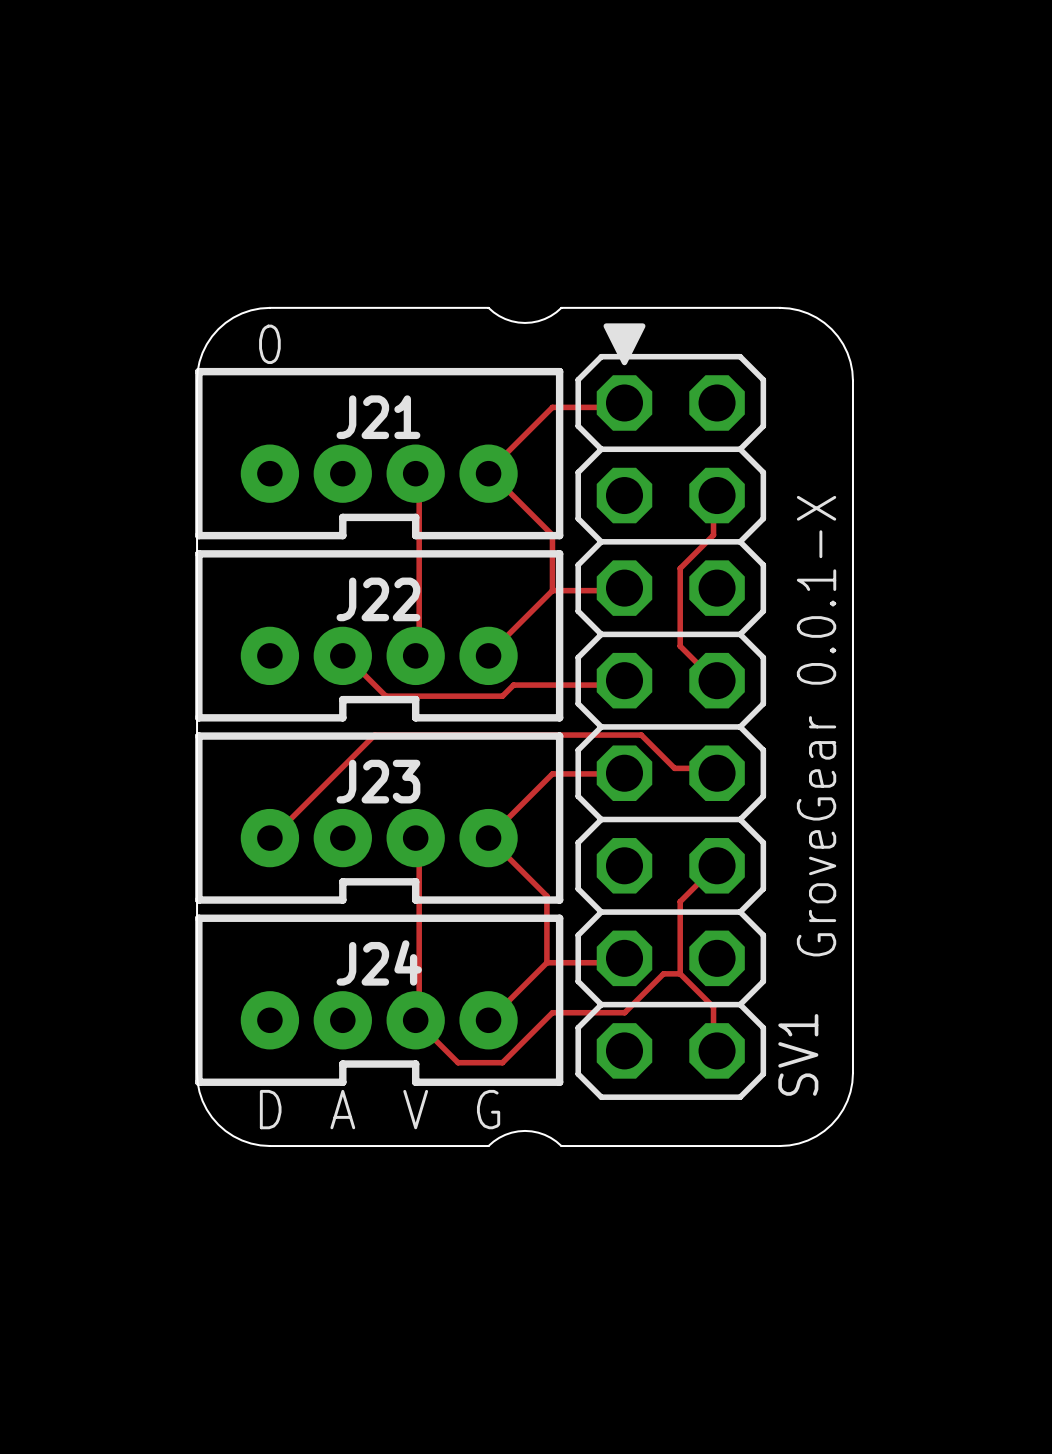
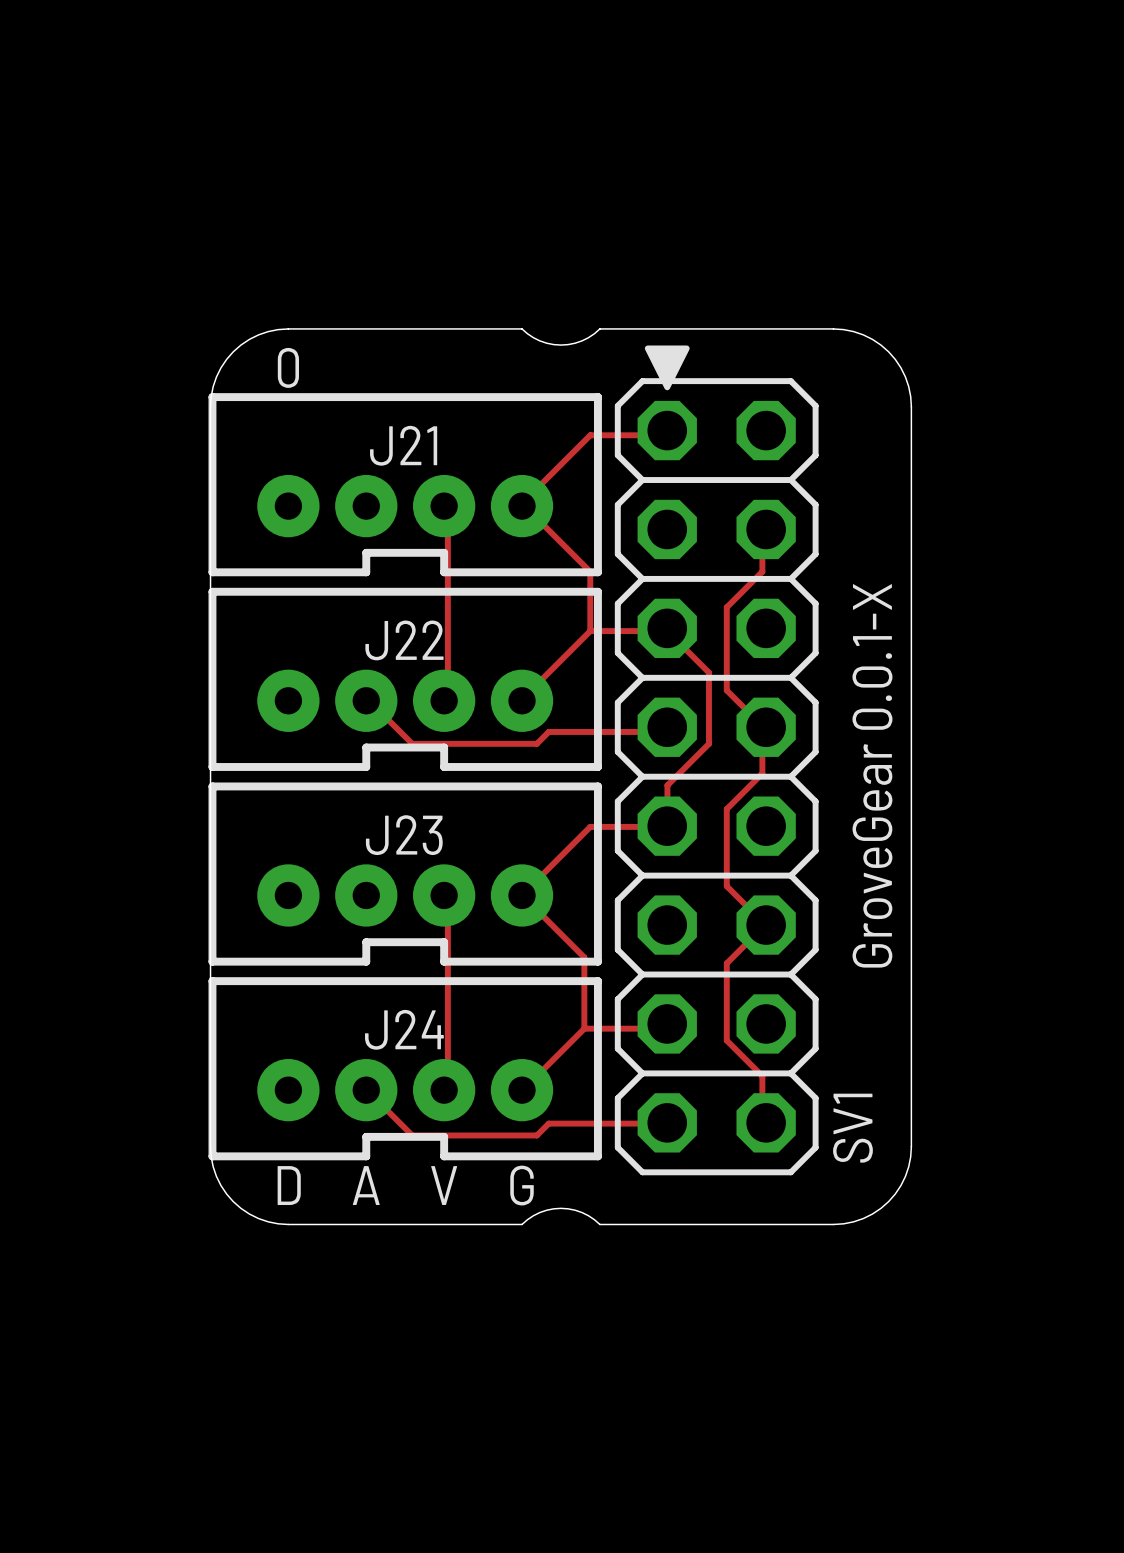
track: none -> (667, 628) (667, 631) (708, 672) (708, 743) (667, 785) (667, 826)
track: none -> (766, 727) (762, 731) (762, 773) (726, 809) (726, 886) (766, 925)
track: (717, 773) (713, 768) (674, 768) (641, 735) (374, 735) (269, 838) -> none
track: (680, 973) (663, 973) (624, 1012) (552, 1012) (513, 1051) -> (667, 1122) (548, 1123)
track: (415, 1020) (458, 1062) -> (366, 1090) (412, 1135) (489, 1135)

